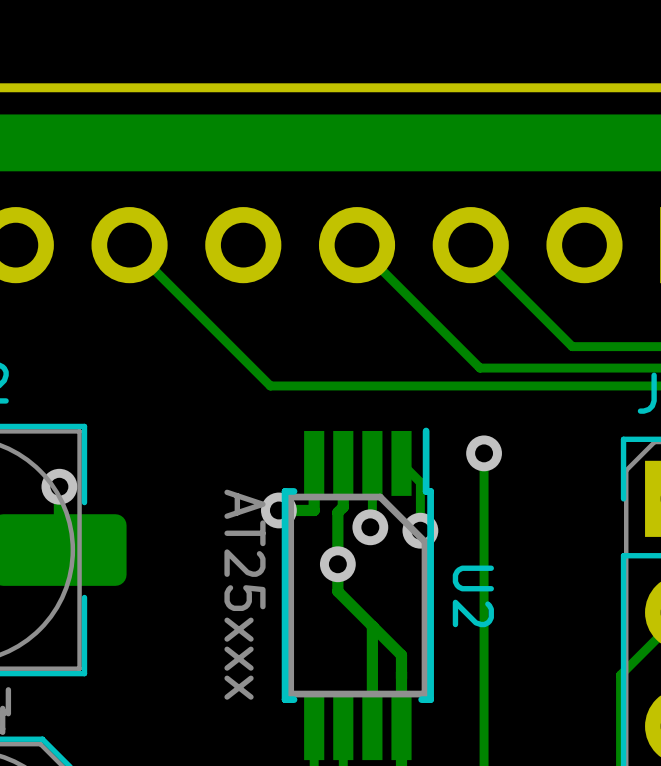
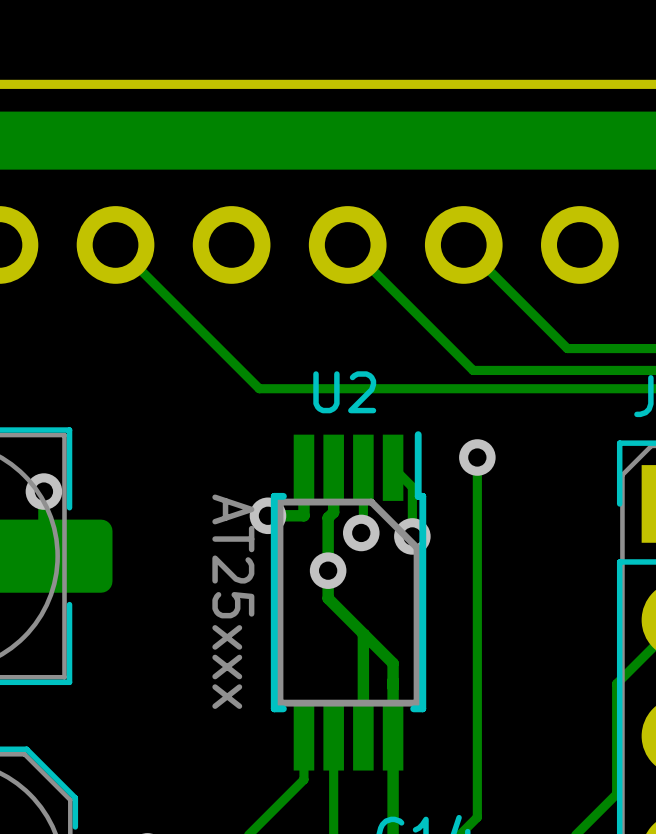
U2 name rotation: 0° (473, 596) -> 90° counterclockwise (344, 392)
U2 name position: U2 (473, 596) -> U2 (344, 392)

